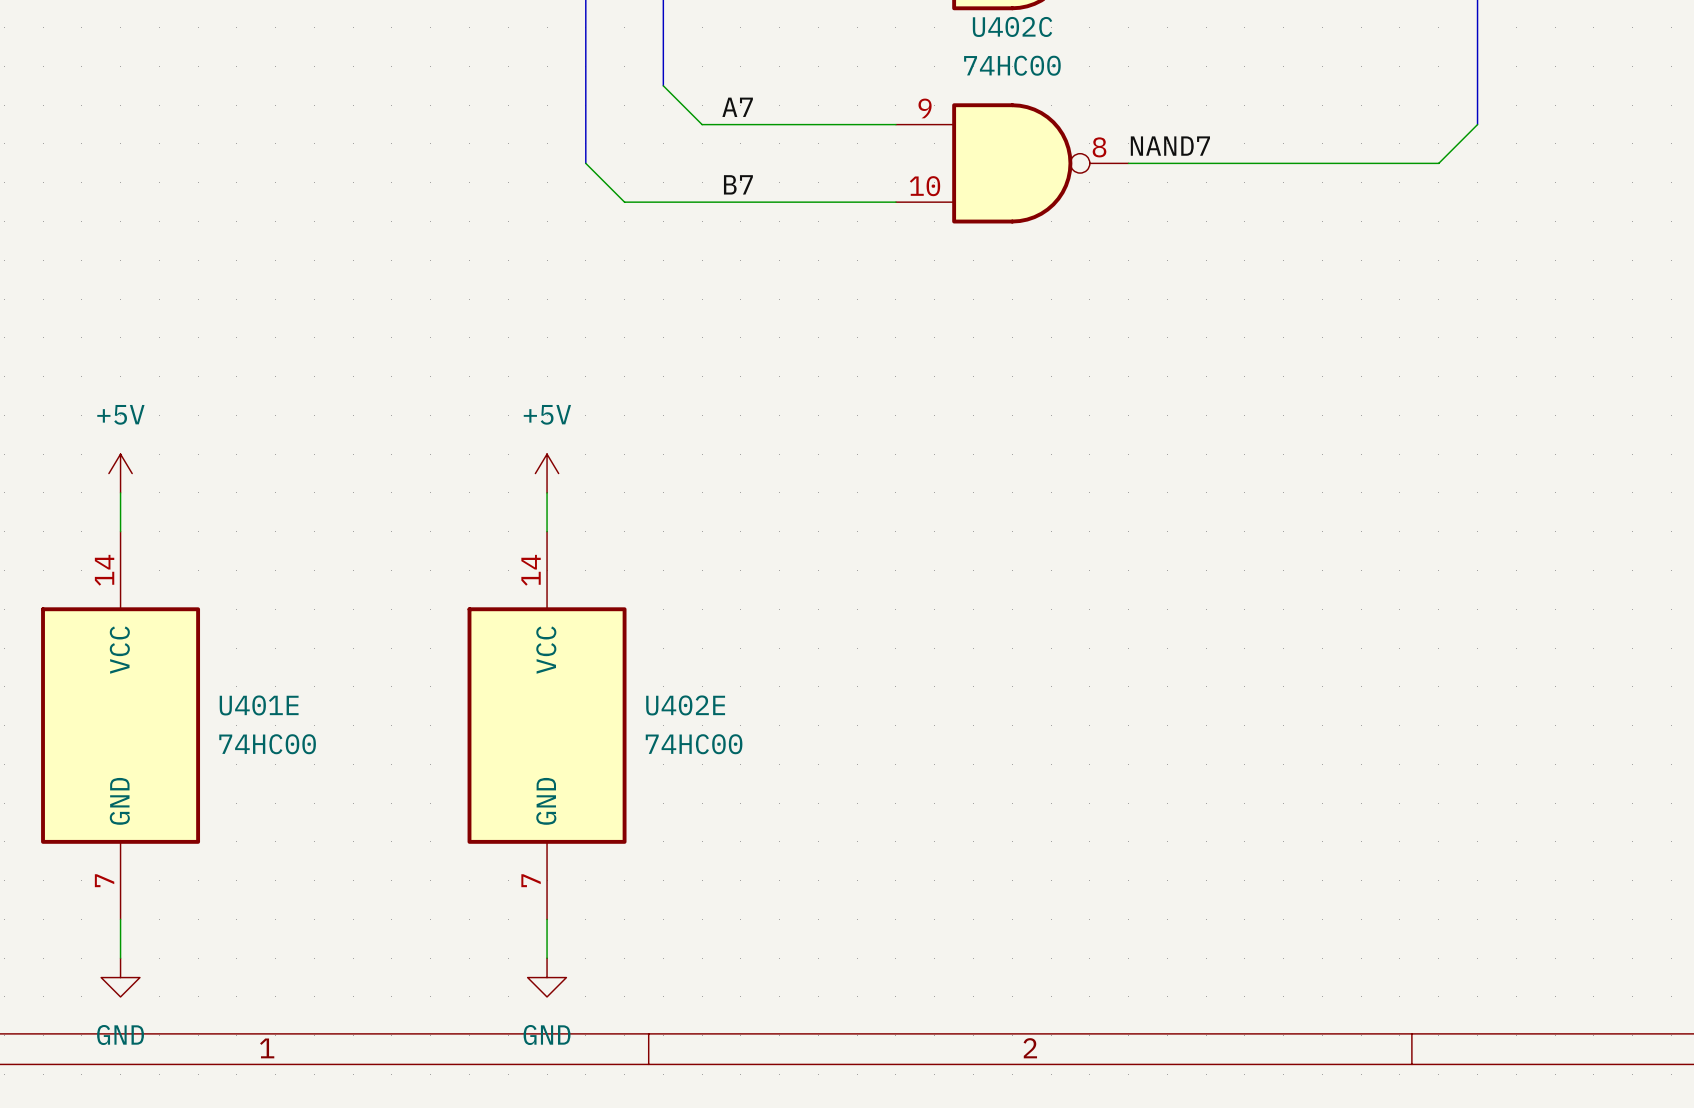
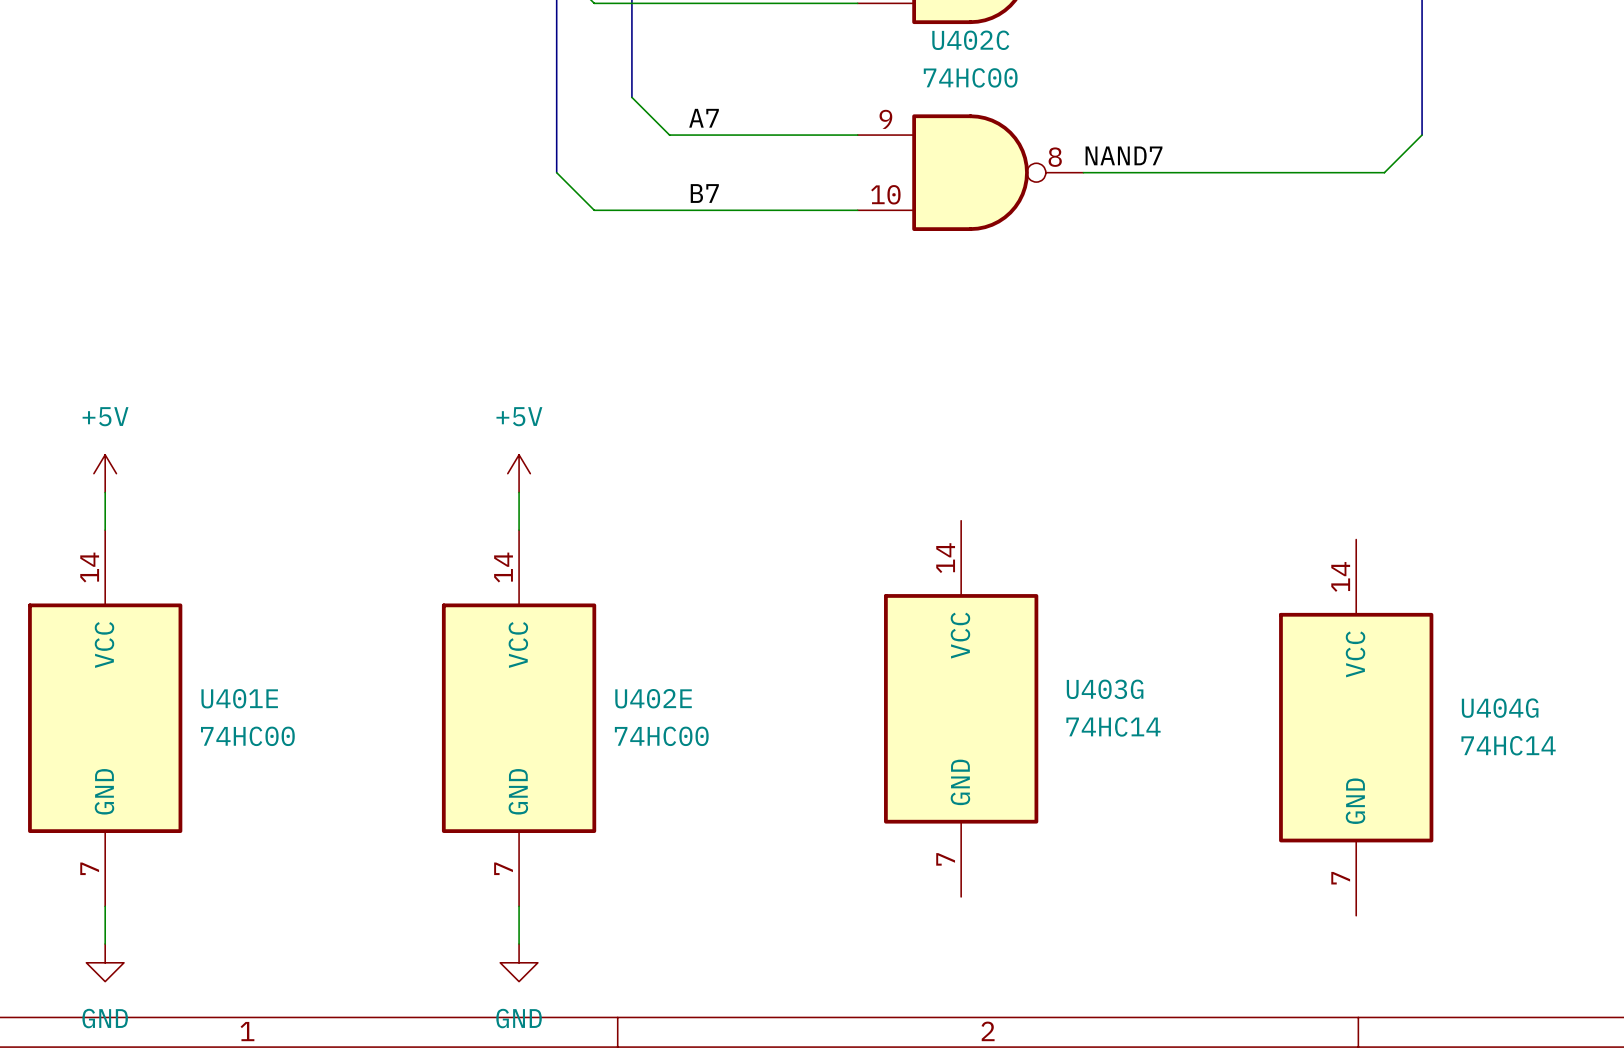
U403G: none -> 74HC14 (961, 708)
U404G: none -> 74HC14 (1356, 727)

